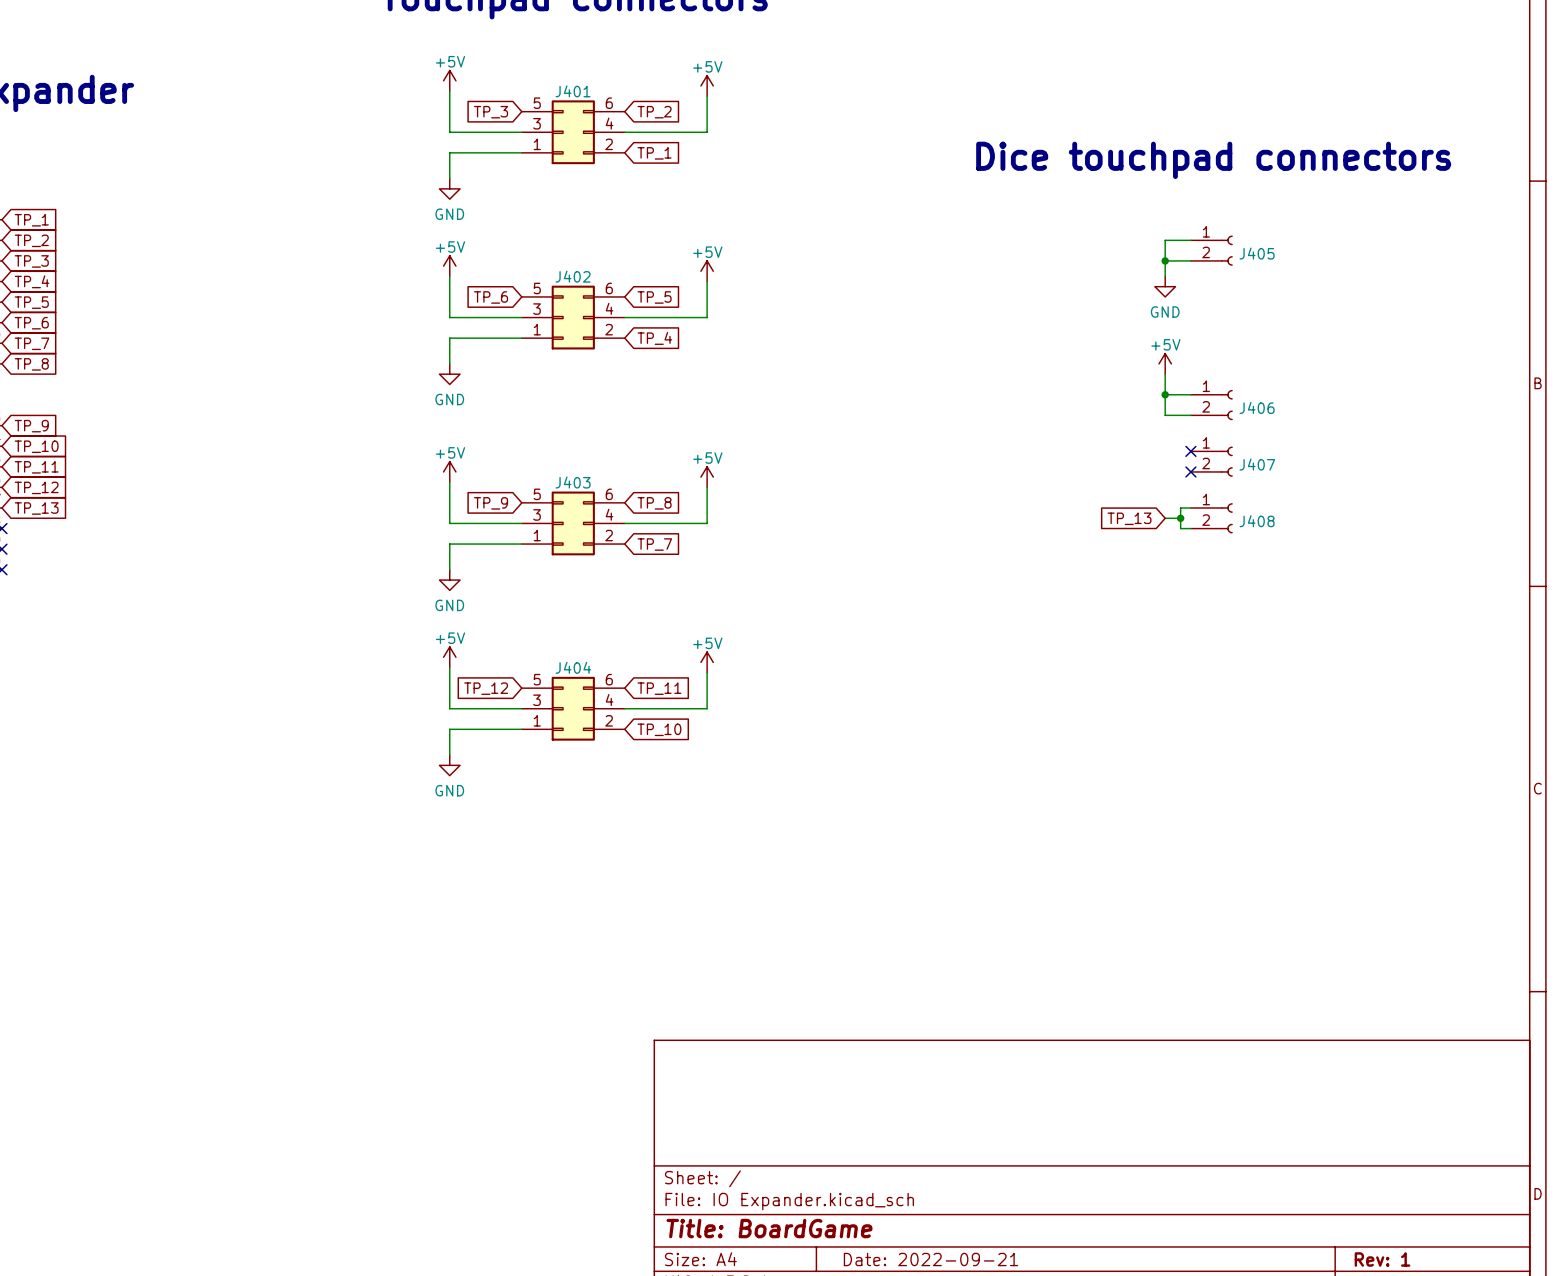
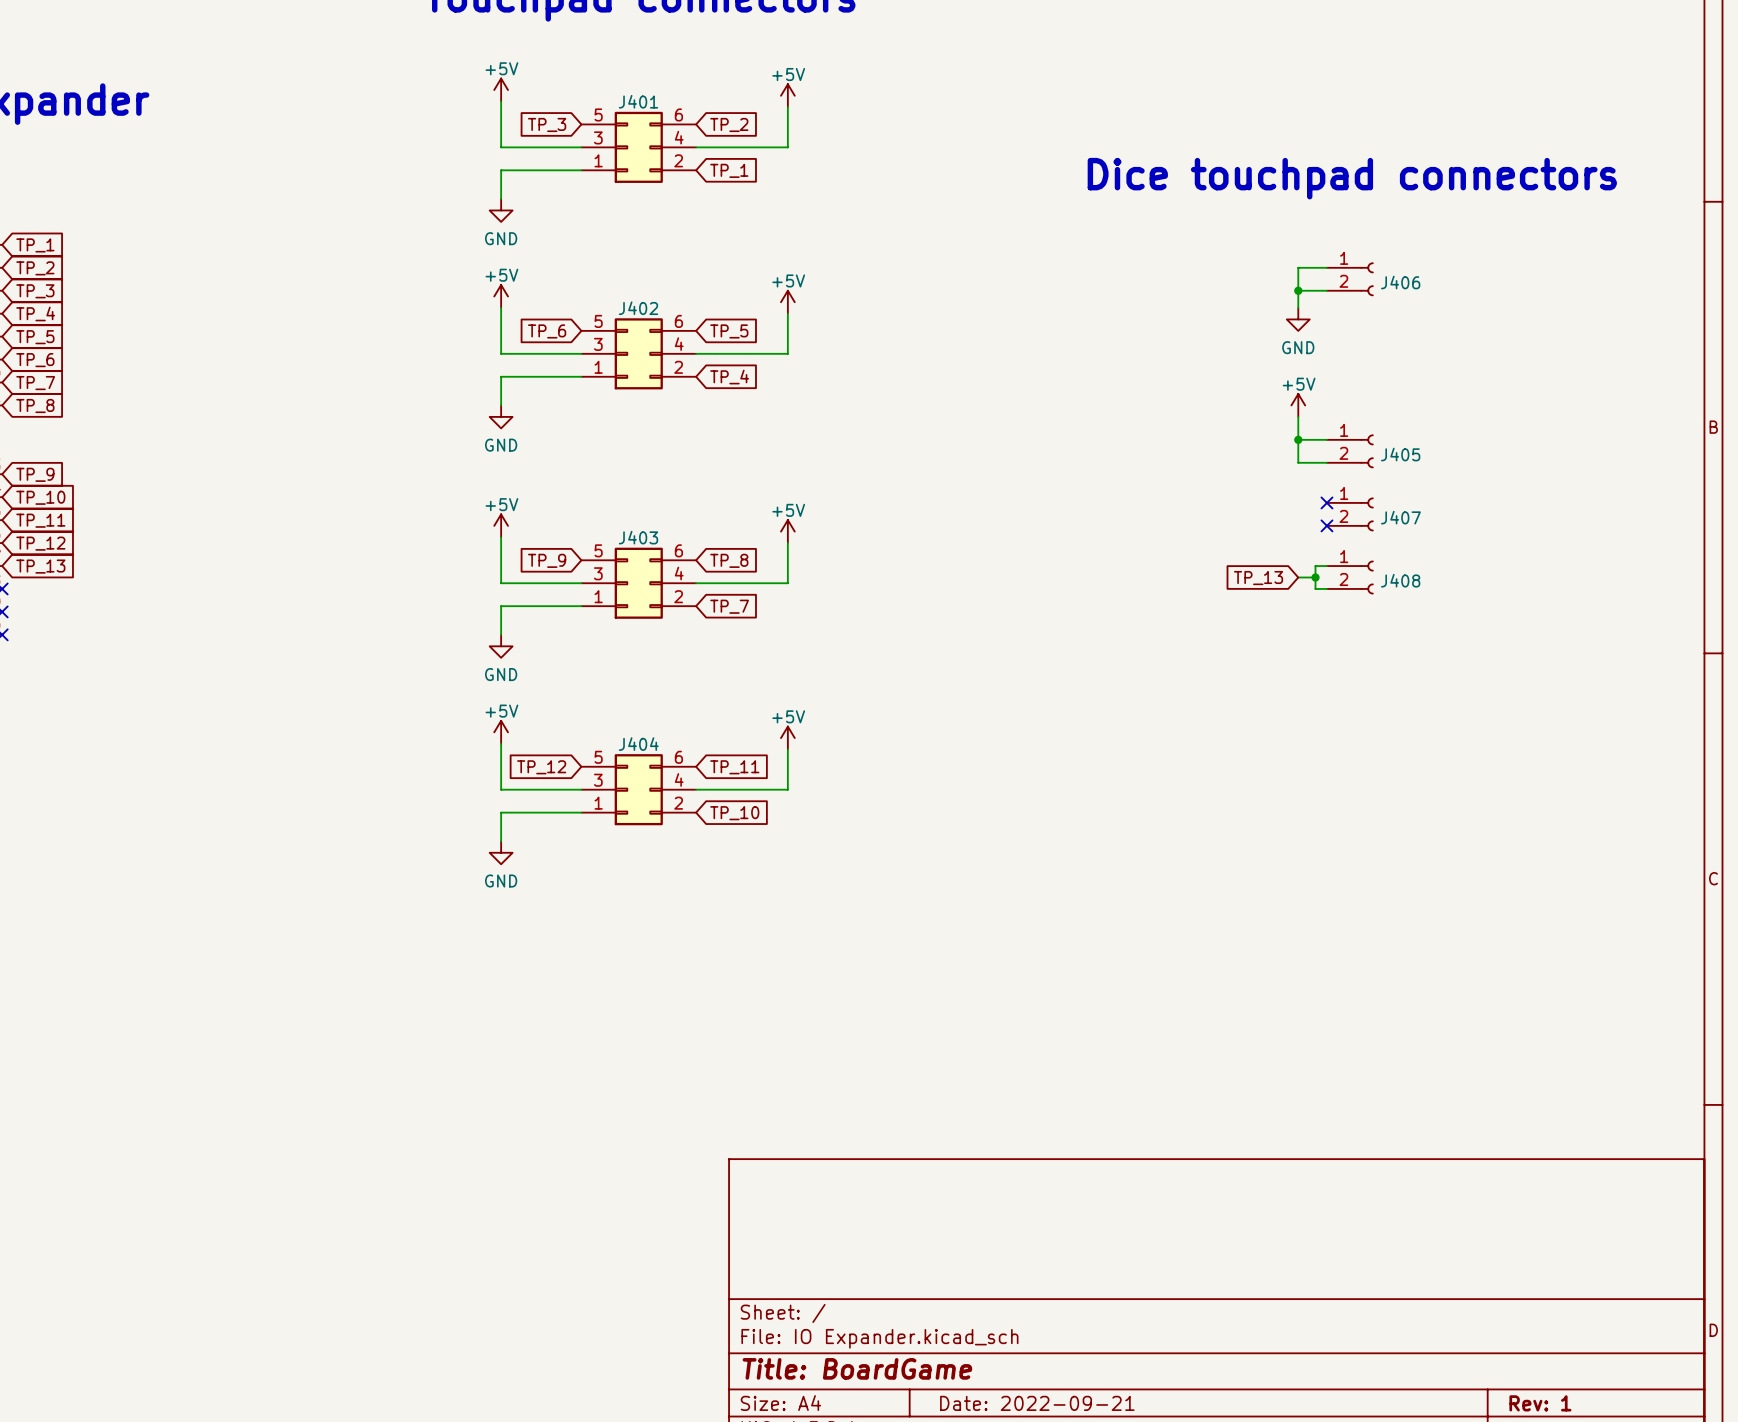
J405 name: J405 (1257, 253) -> J406 (1400, 282)
J406 name: J406 (1257, 407) -> J405 (1400, 454)

